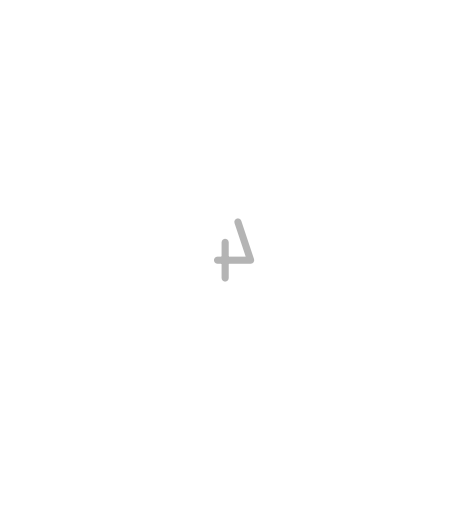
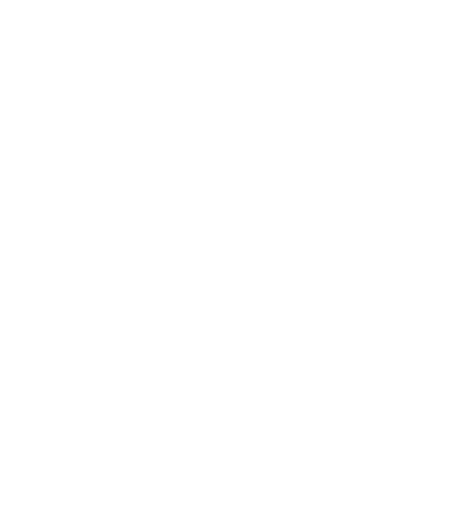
drawing: [213, 218, 255, 282] -> none

